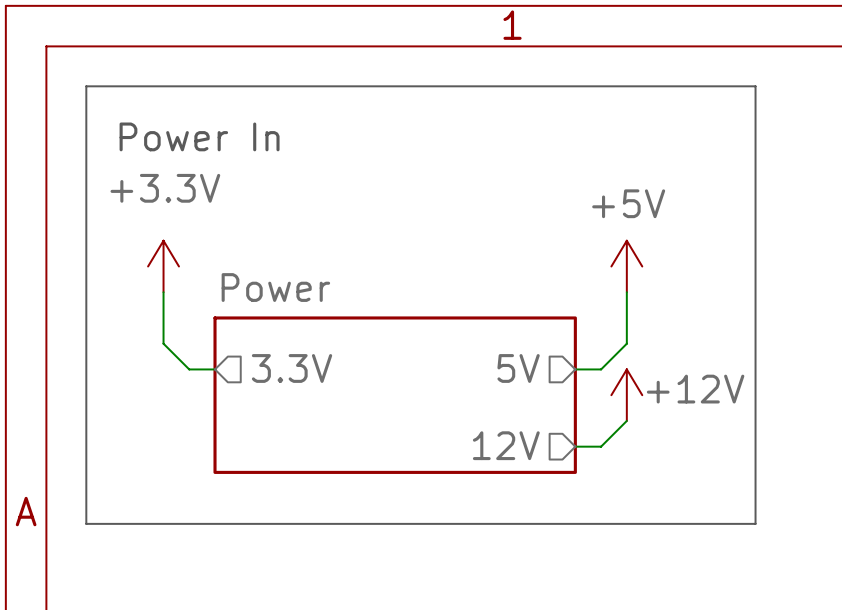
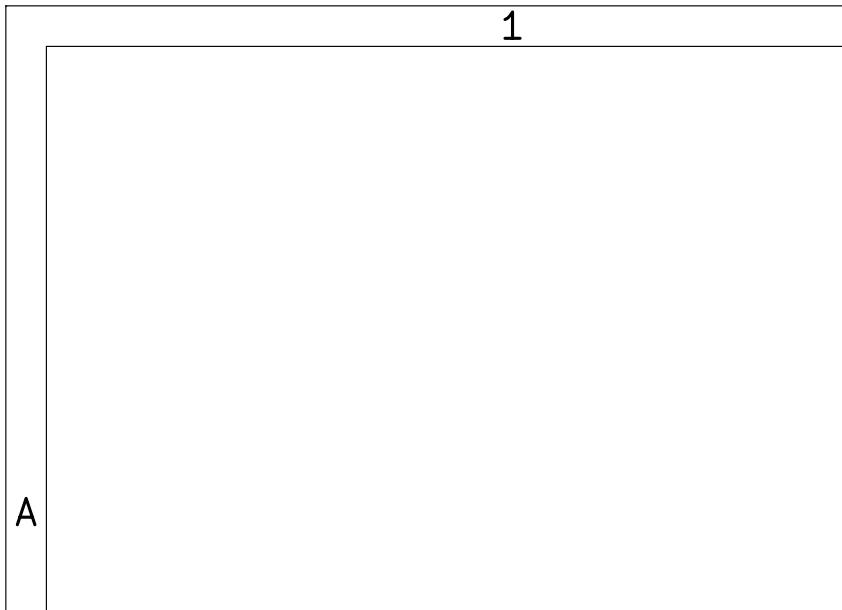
line: (86, 86) (755, 86) (755, 523) (86, 523) (86, 86) -> none
text: Power In (199, 136) -> none
power symbol: +3.3V (163, 266) -> none
power symbol: +5V (626, 266) -> none
wire: (163, 292) (163, 343) (189, 369) (215, 369) -> none
wire: (626, 292) (626, 343) (601, 369) (575, 369) -> none
sheet pin: 3.3V (292, 368) -> none
sheet pin: 5V (518, 368) -> none
sheet Power: (395, 395) -> none
power symbol: +12V (626, 395) -> none
wire: (626, 420) (601, 446) (575, 446) -> none
sheet pin: 12V (506, 445) -> none

